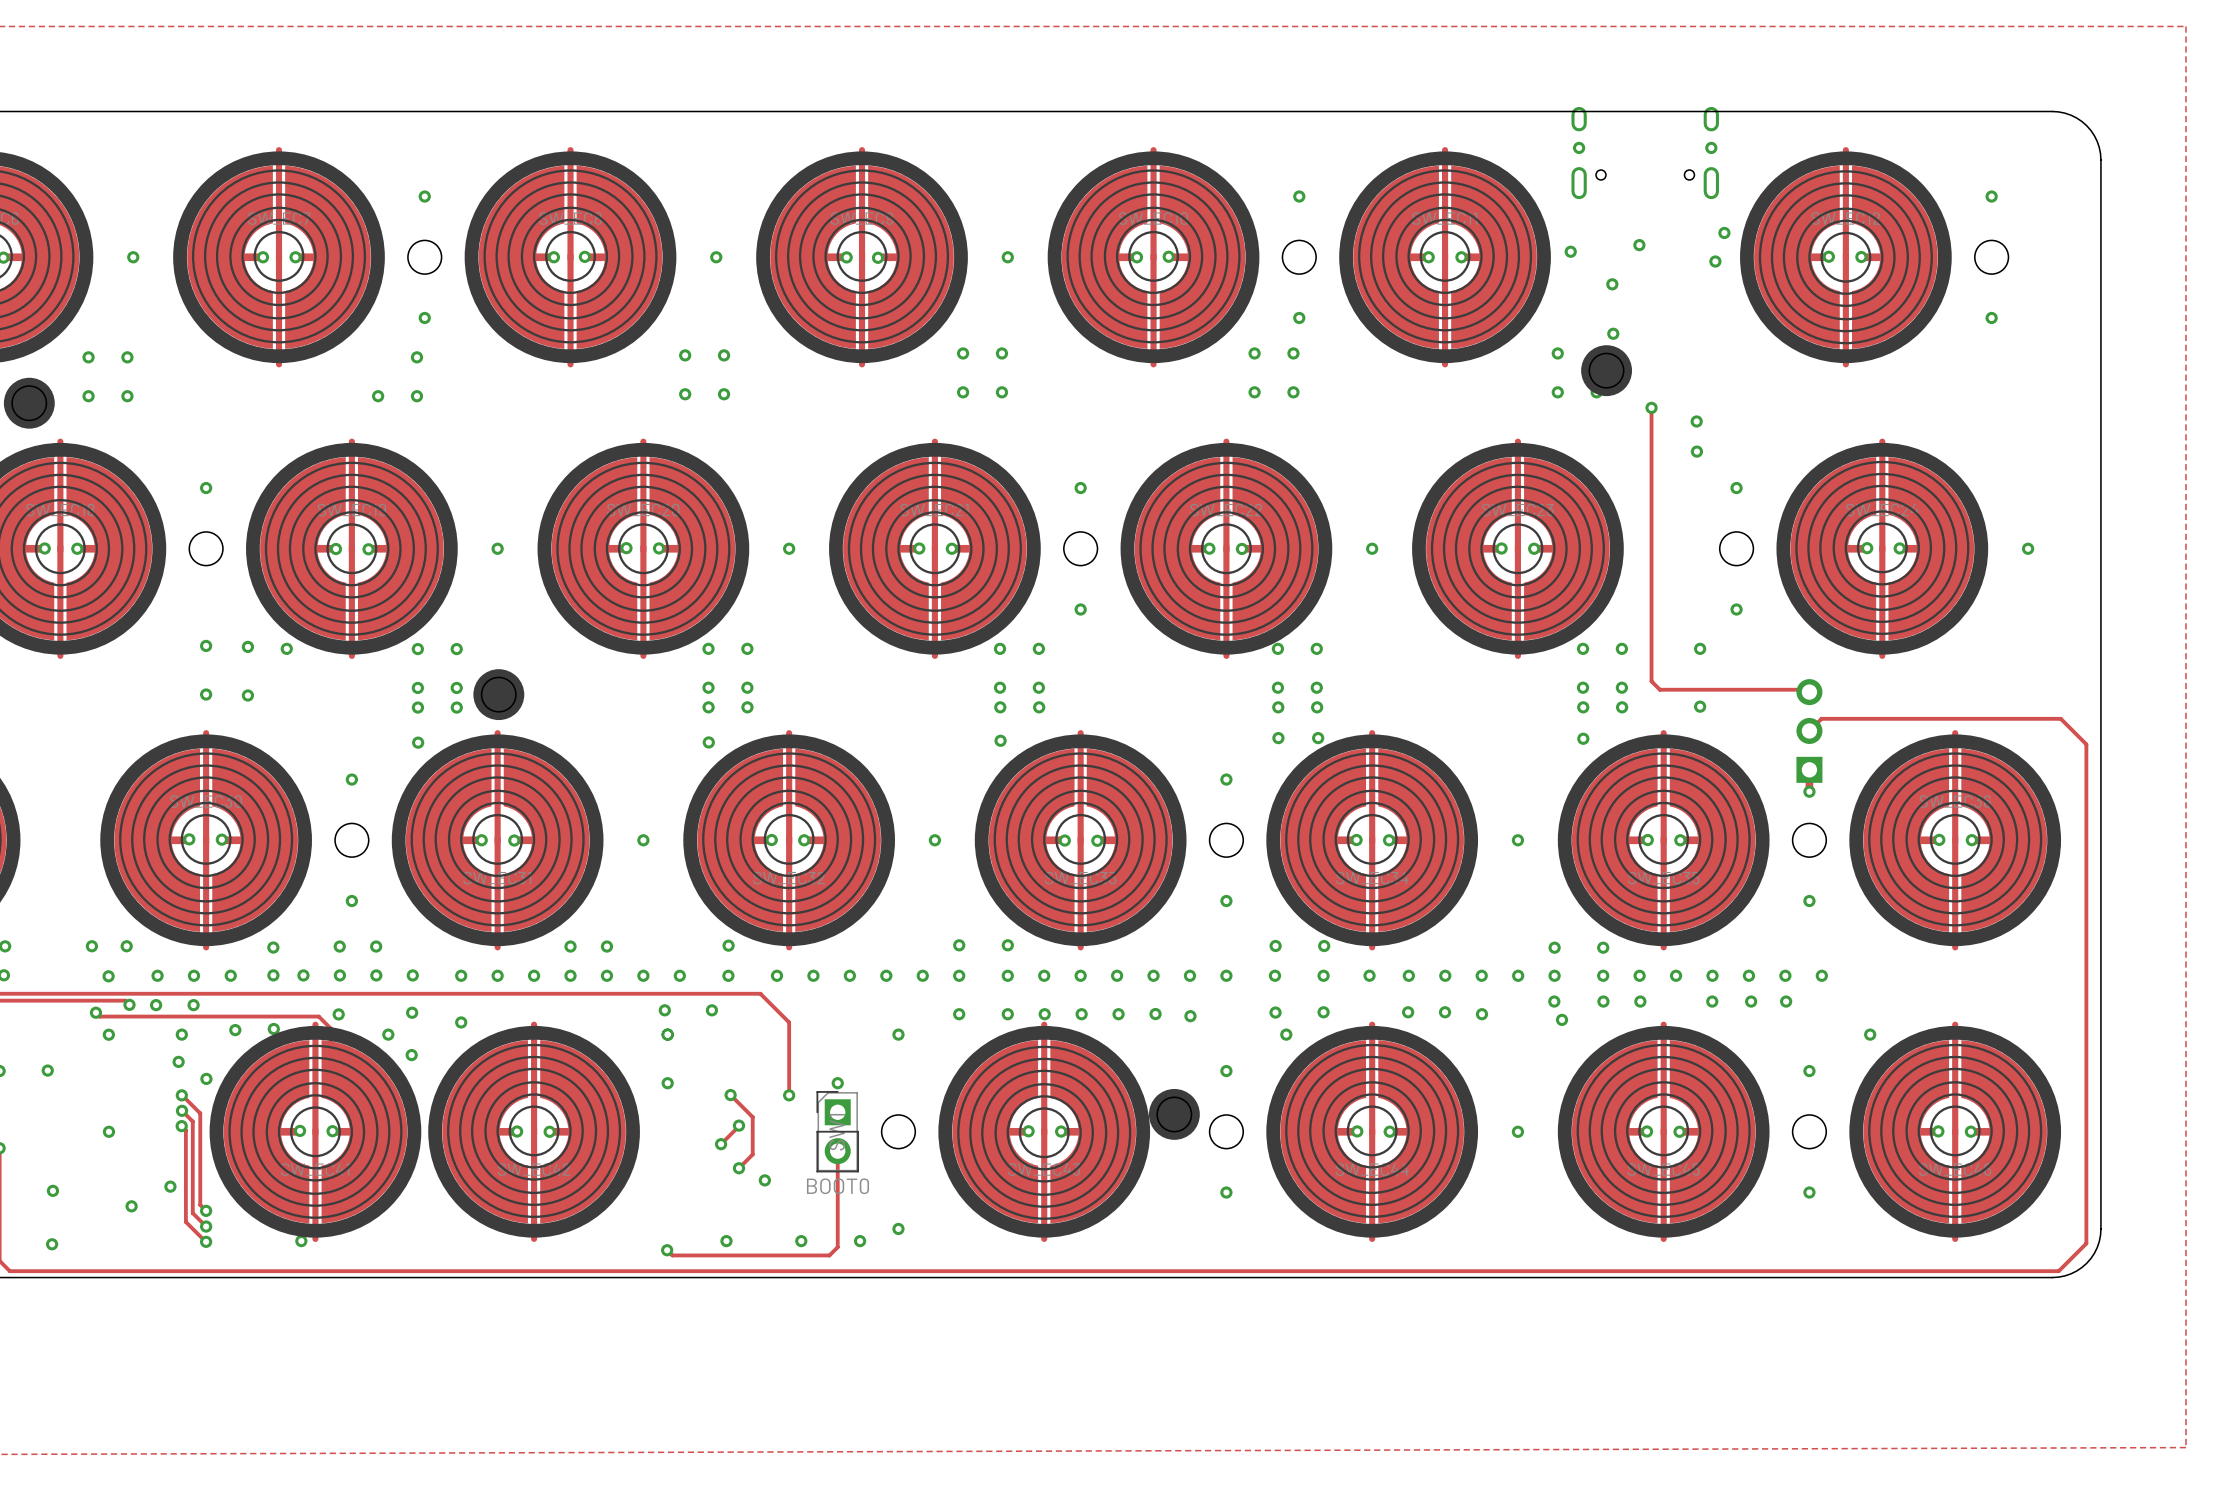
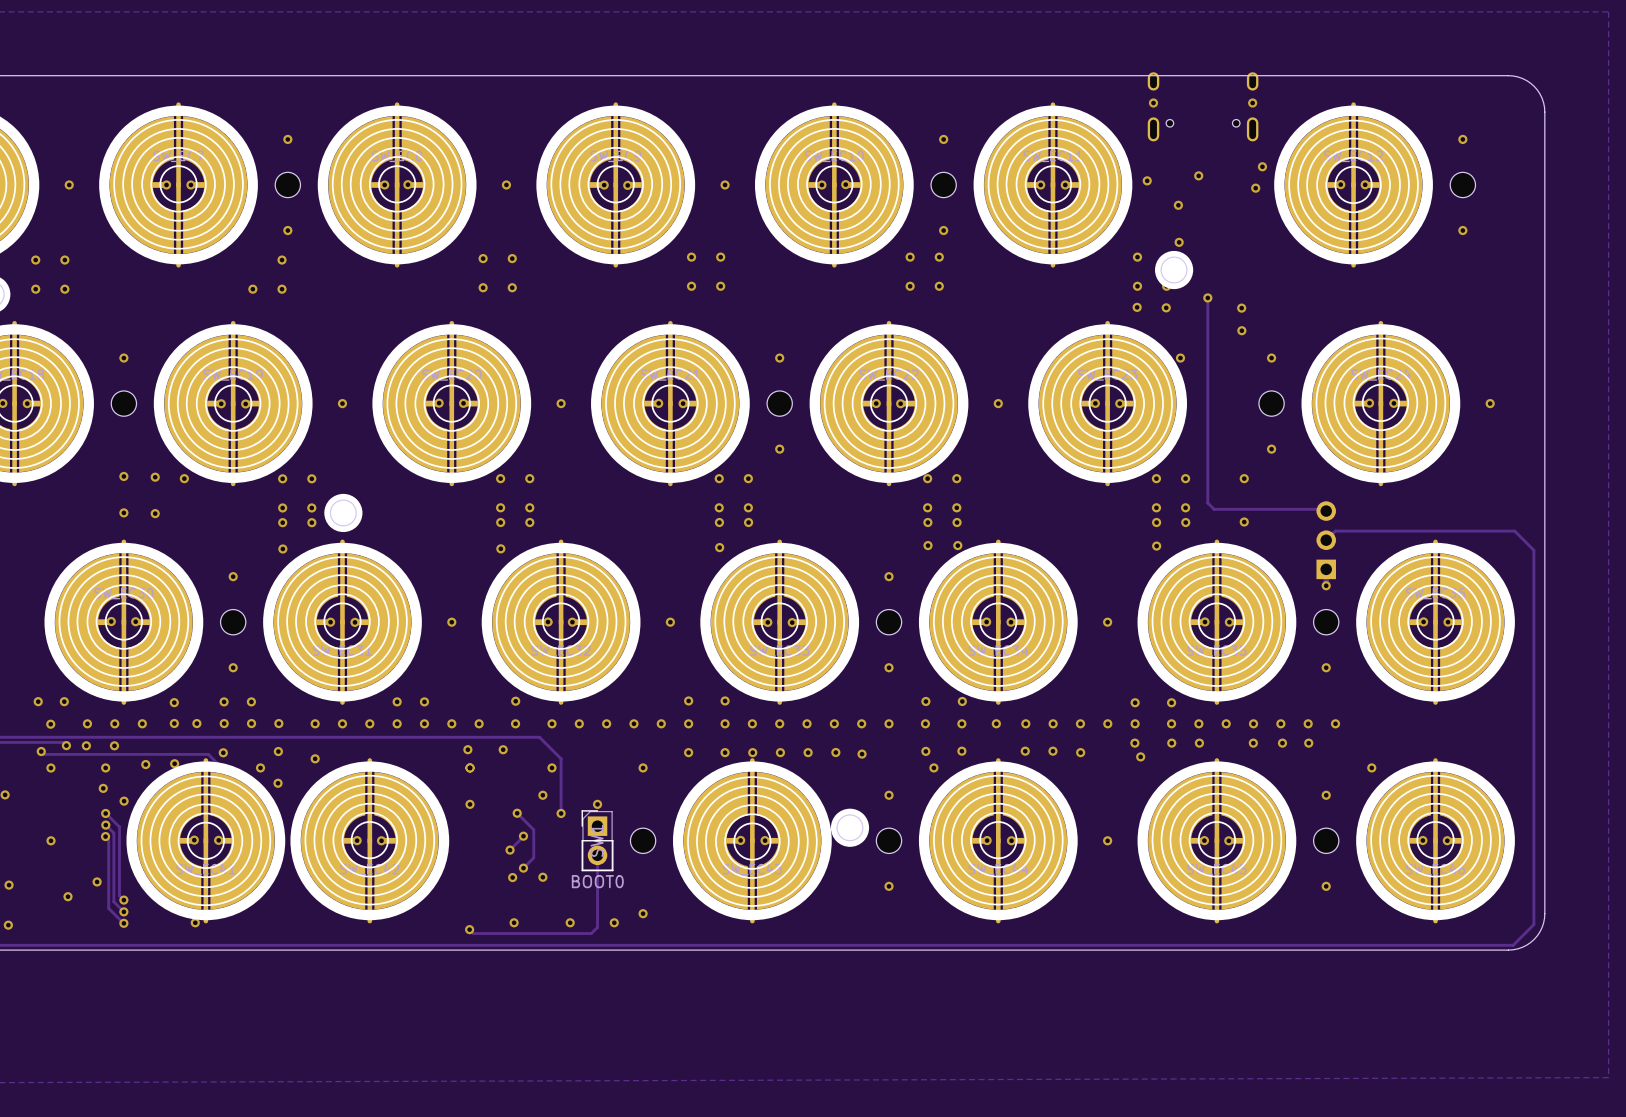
via: none -> (1137, 307)
via: none -> (1166, 307)
via: none -> (1180, 358)
via: none -> (551, 767)
via: none -> (542, 795)
via: none -> (512, 877)

